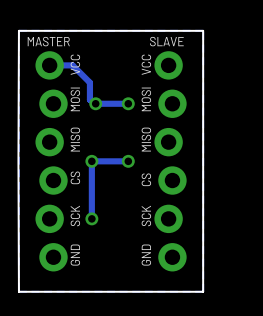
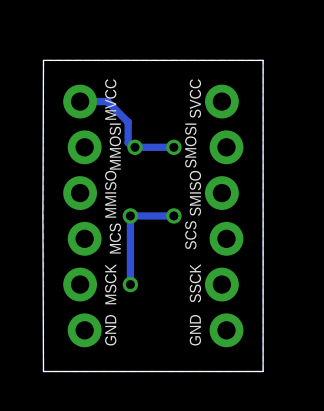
text: MASTER (48, 41) -> none
text: SLAVE (166, 41) -> none
text: VCC (75, 64) -> MVCC (110, 99)
text: VCC (146, 64) -> SVCC (195, 98)
text: MOSI (75, 99) -> MMOSI (115, 146)
text: MOSI (146, 99) -> SMOSI (190, 145)
text: MISO (75, 139) -> MMISO (110, 194)
text: MISO (146, 139) -> SMISO (195, 193)
text: CS (75, 177) -> MCS (115, 238)
text: CS (146, 179) -> SCS (190, 235)
text: SCK (75, 215) -> MSCK (110, 284)
text: SCK (146, 215) -> SSCK (195, 283)

